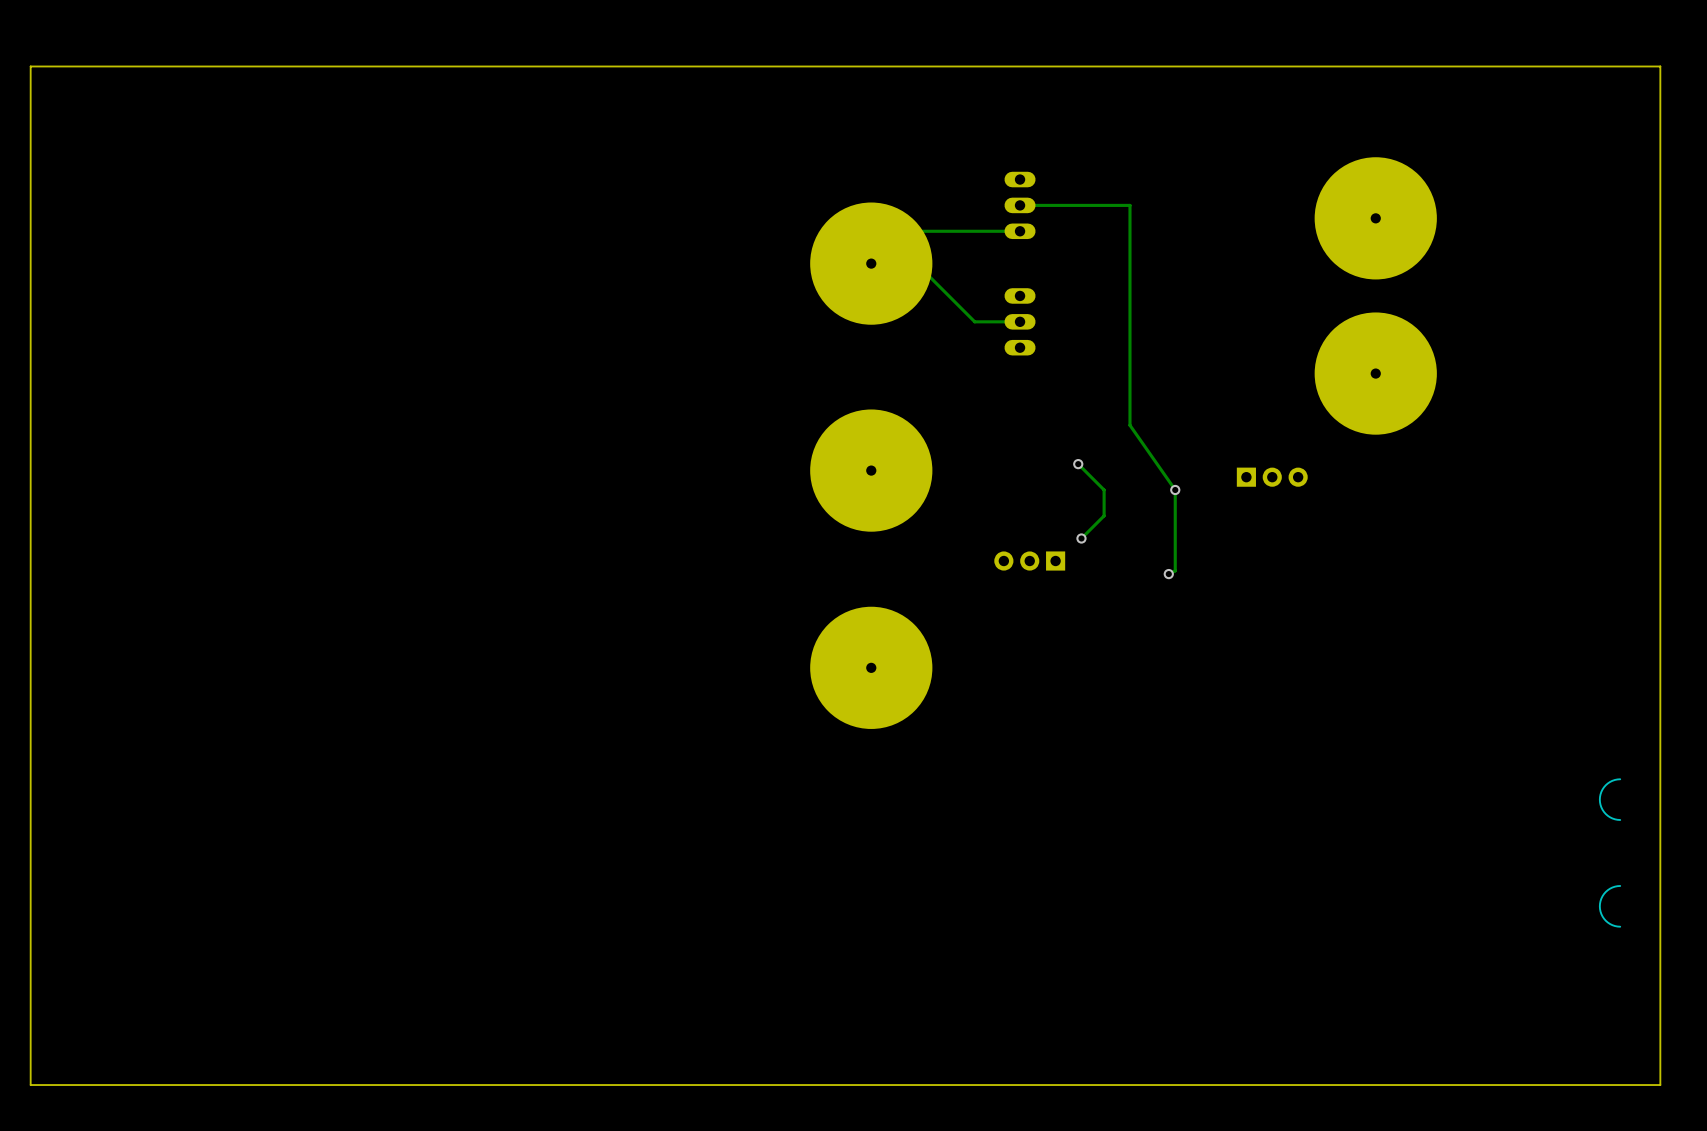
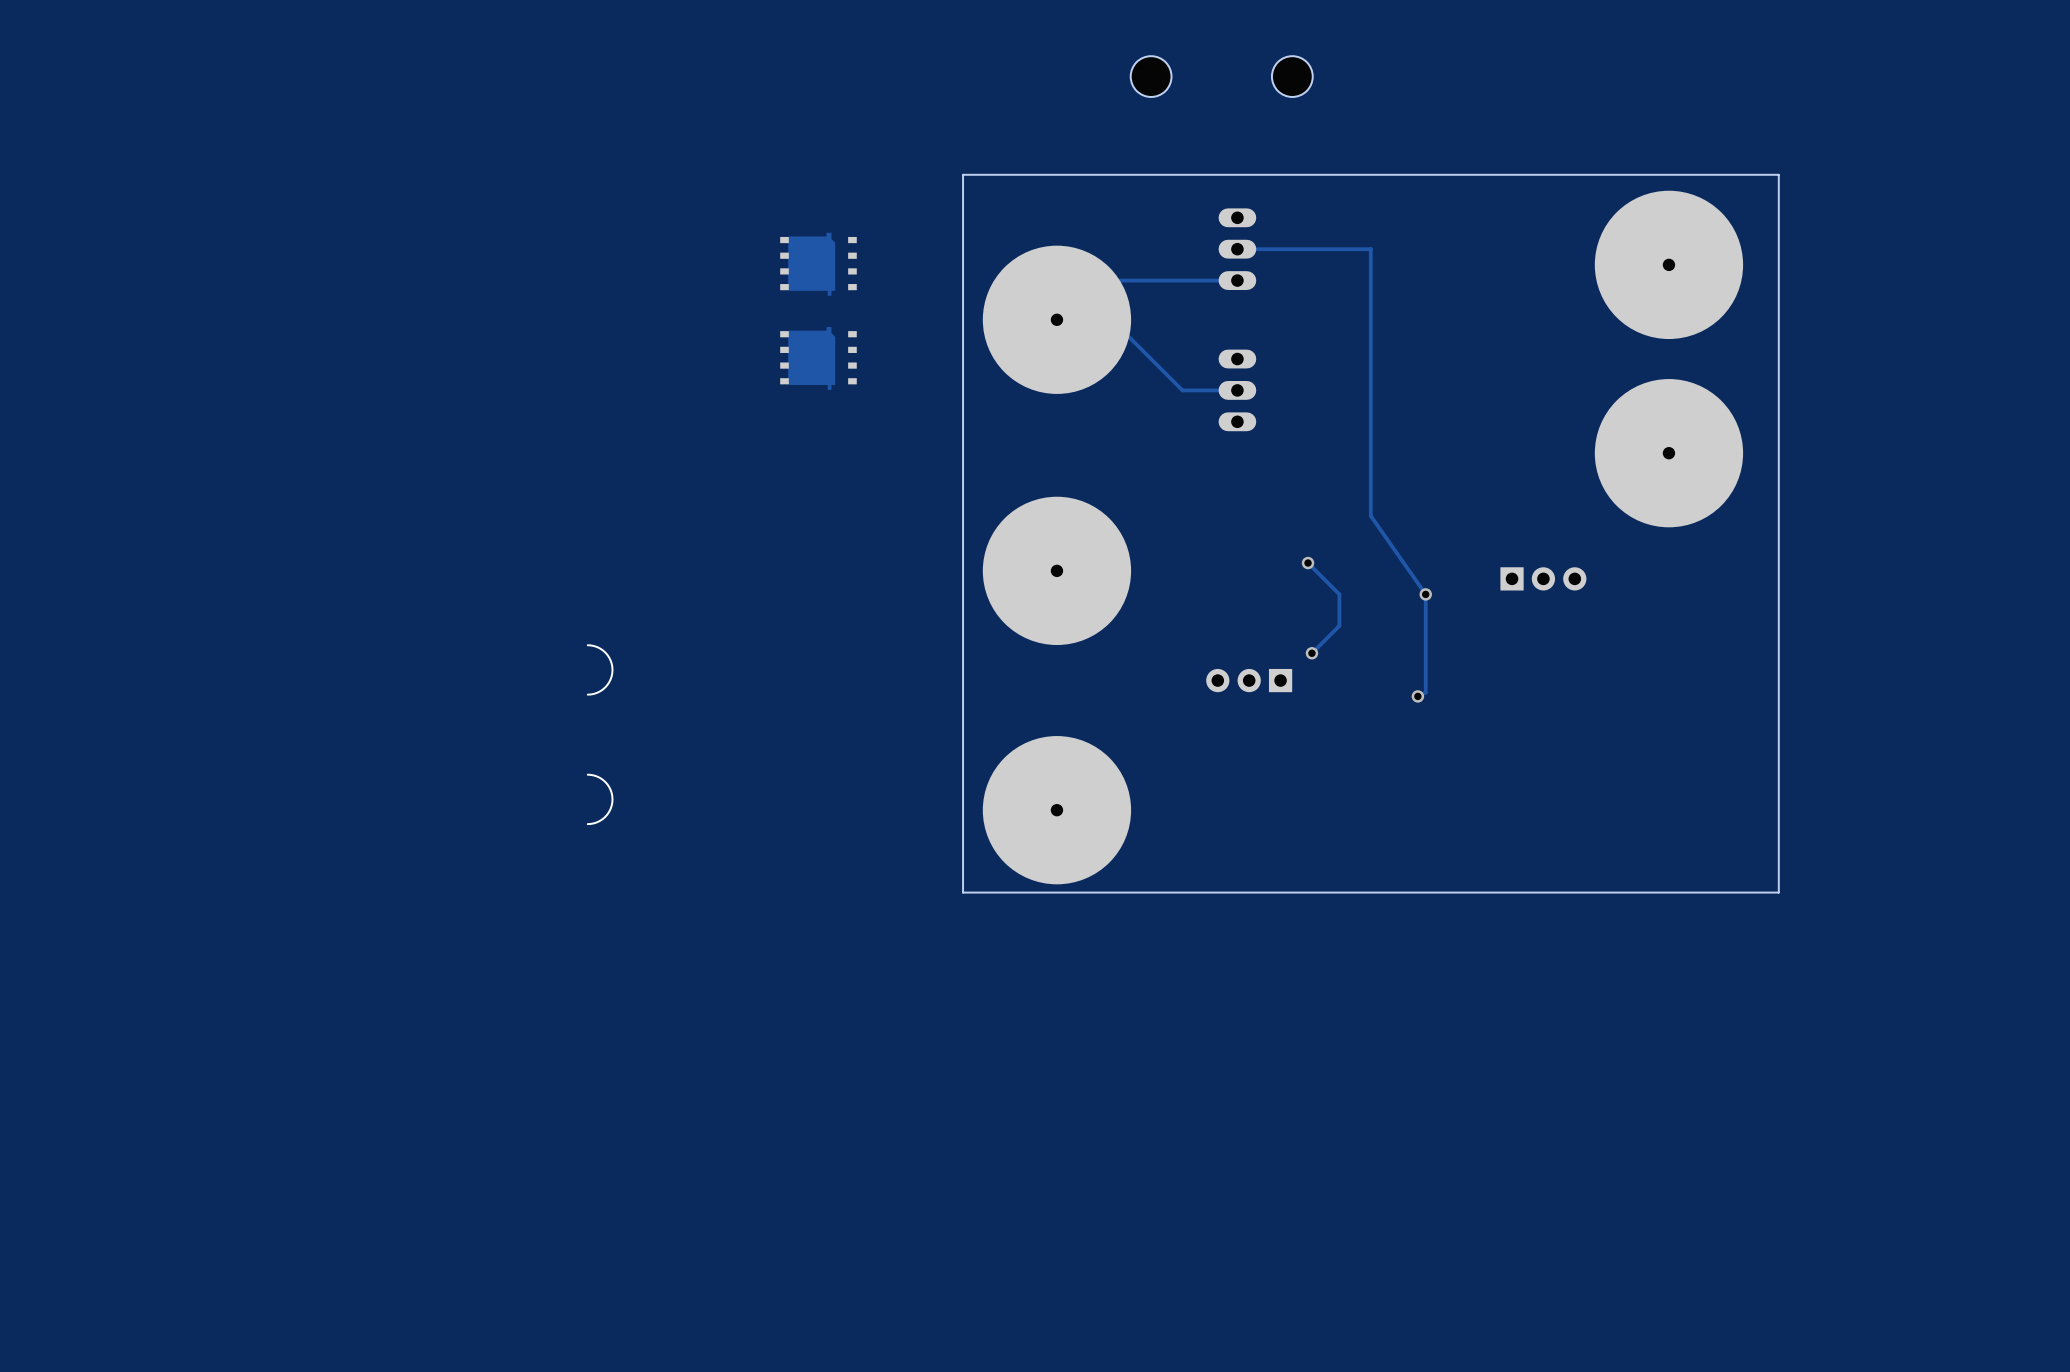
part: none -> (1151, 76)
part: none -> (1292, 76)
board edge: (1660, 66) (30, 66) (30, 1085) (1660, 1085) (1660, 66) -> none
board edge: none -> (1778, 174) (963, 174) (963, 892) (1778, 892) (1778, 174)
part: none -> (818, 264)
part: none -> (818, 358)
part: none -> (600, 669)
part: none -> (600, 799)
part: (1610, 799) -> none
part: (1610, 906) -> none

